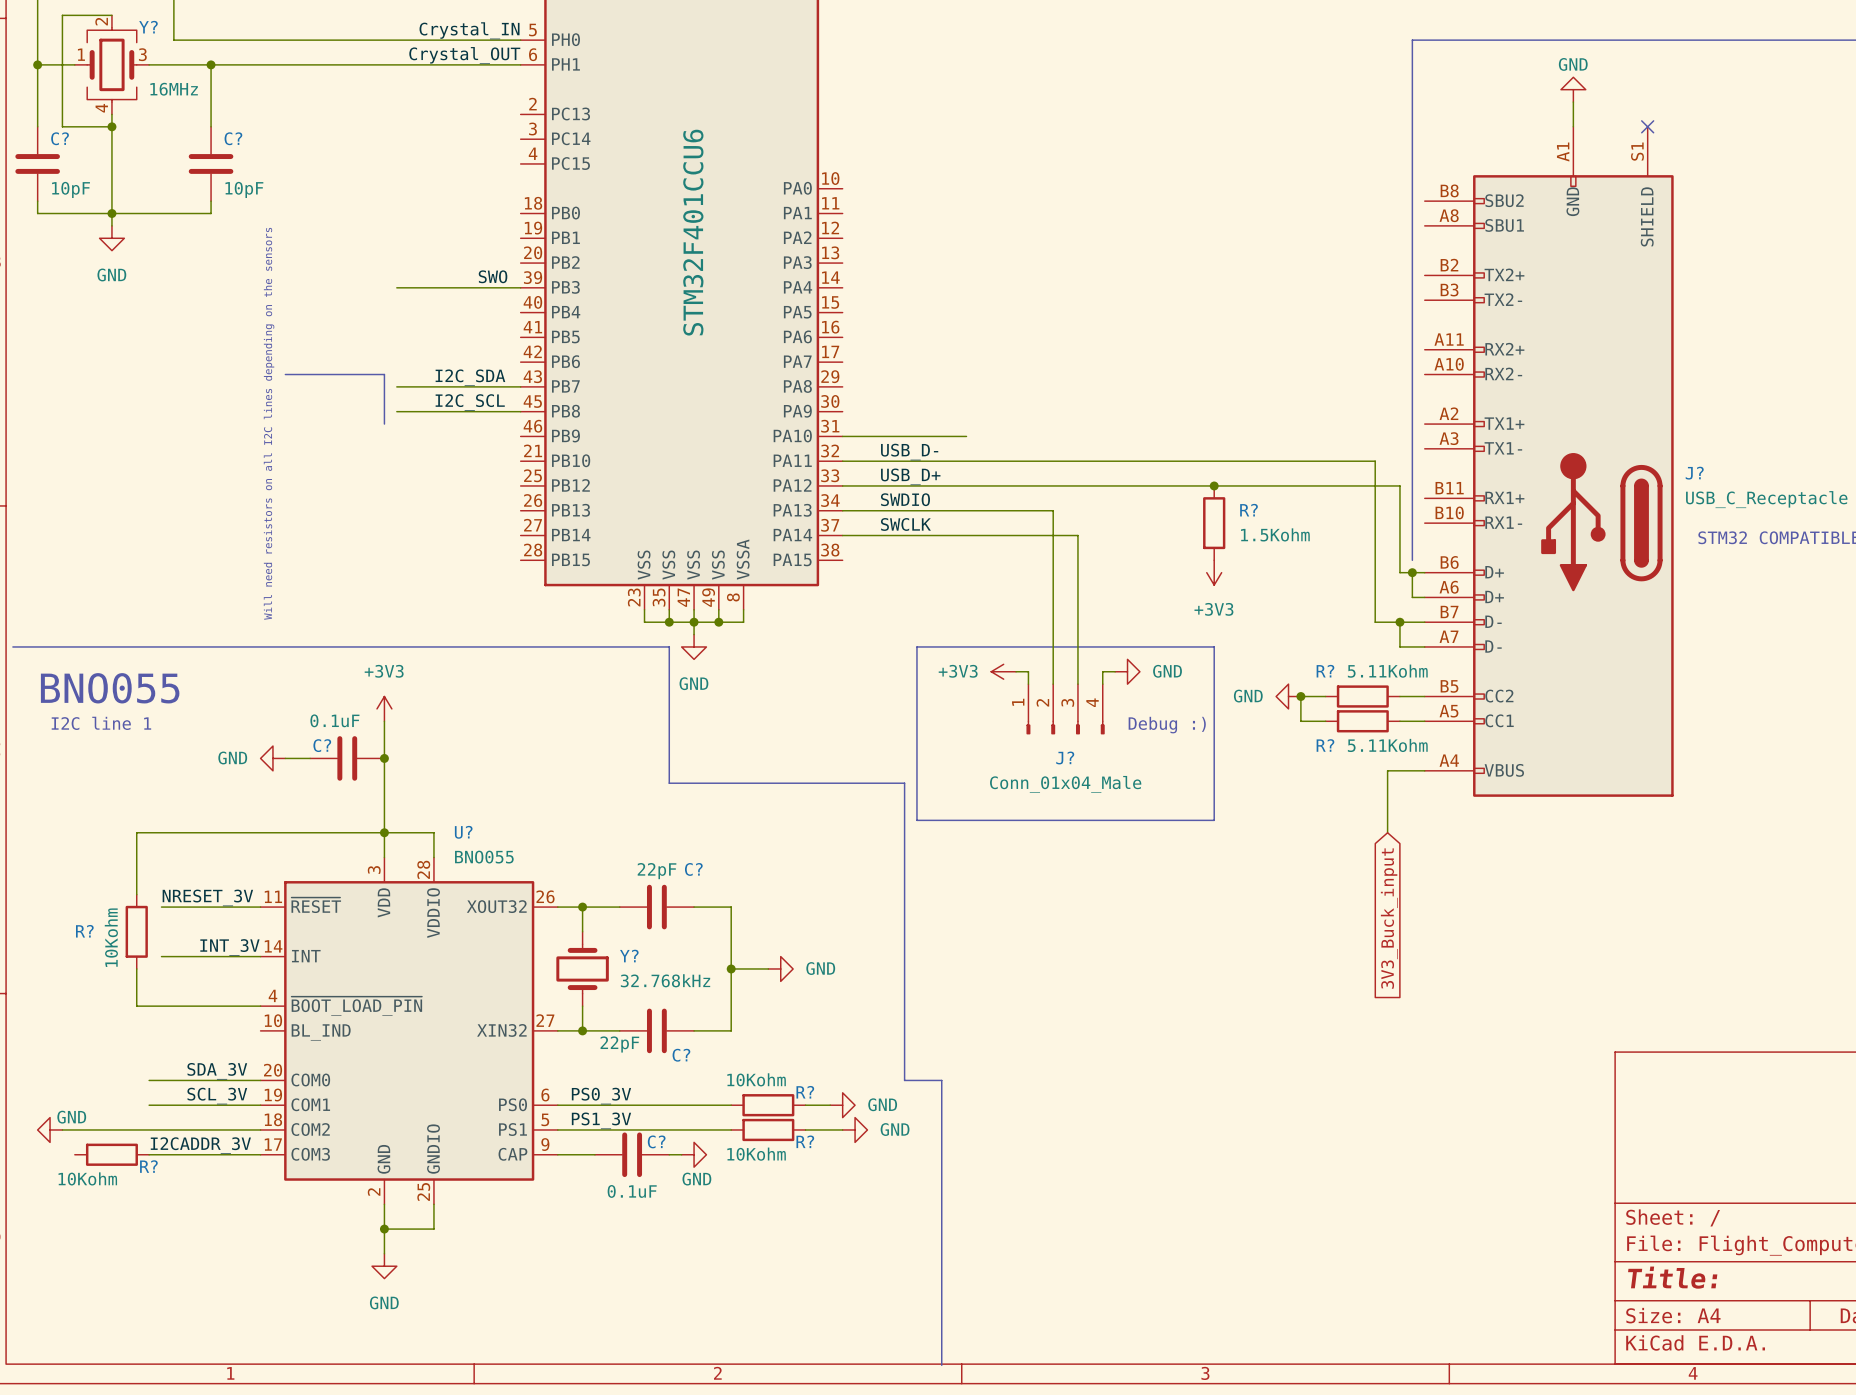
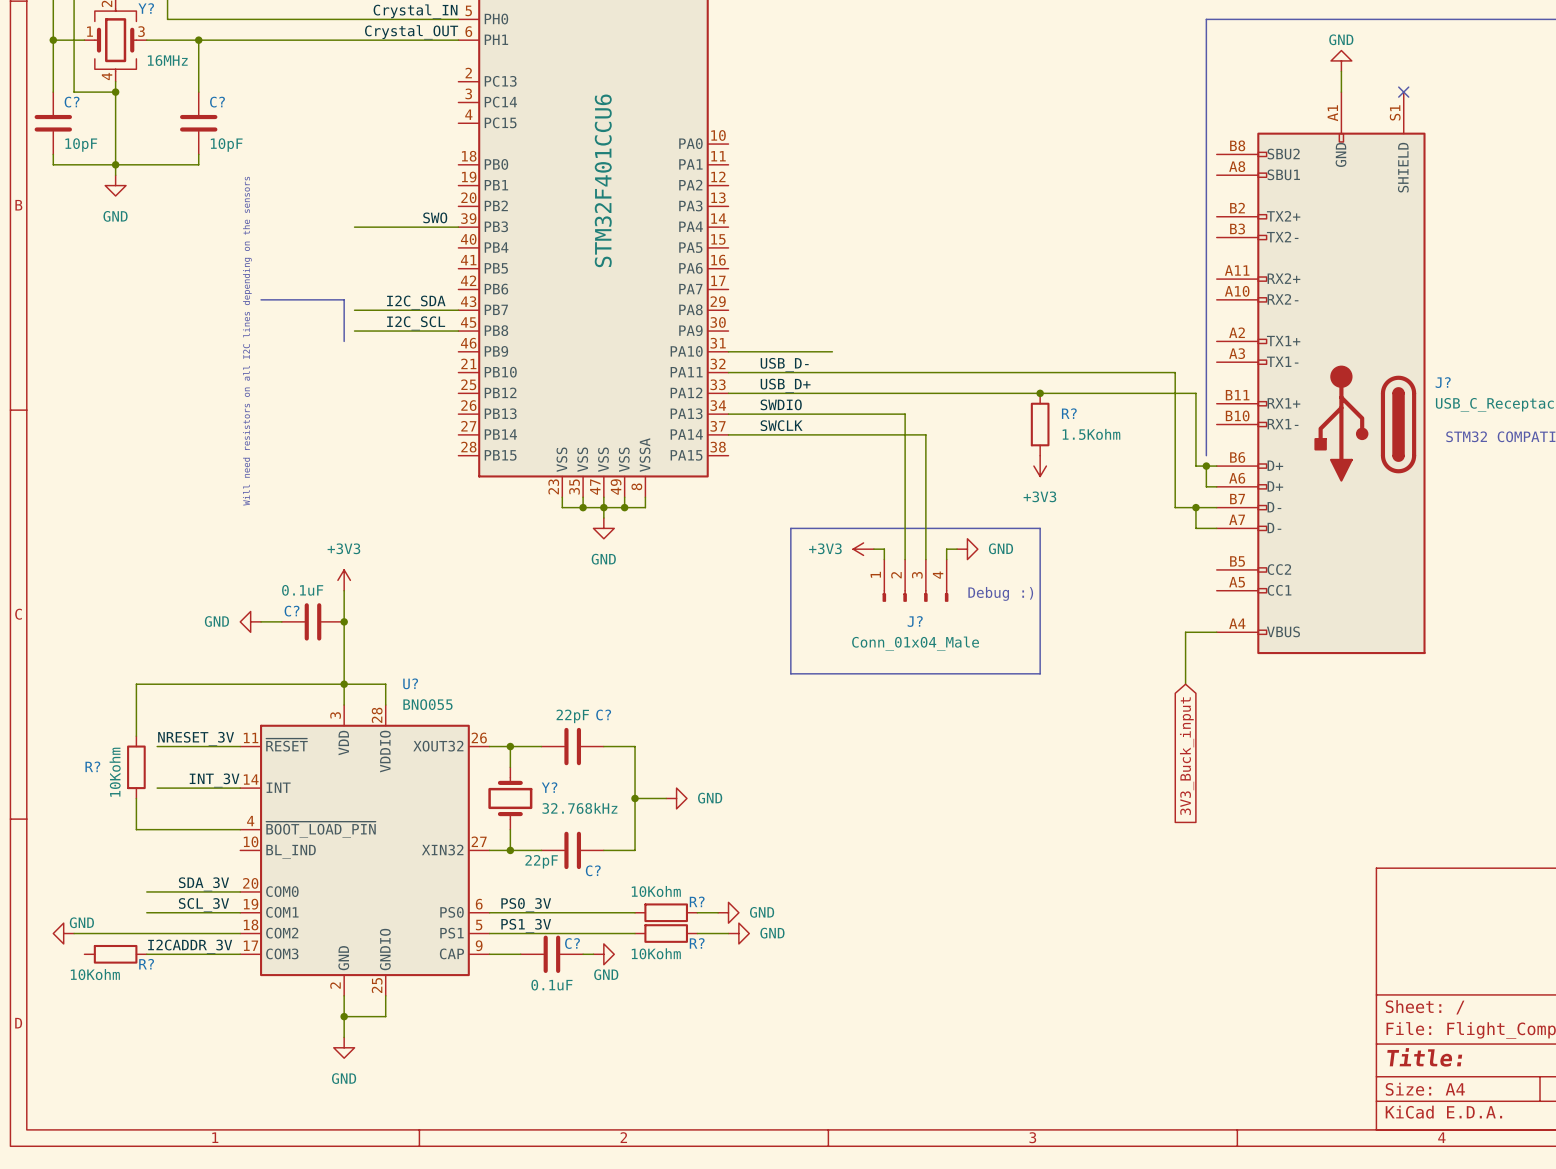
line: (12, 646) (669, 646) (669, 783) (904, 783) (904, 1080) (941, 1080) (941, 1365) -> none
text: BNO055 (110, 688) -> none
power symbol: GND (1288, 696) -> none
junction: (1300, 696) -> none
wire: (1325, 696) (1300, 696) (1300, 721) (1325, 721) -> none
R?: 5.11Kohm (1362, 696) -> none
wire: (1399, 696) (1424, 696) -> none
R?: 5.11Kohm (1362, 721) -> none
wire: (1399, 721) (1424, 721) -> none
text: I2C line 1 (101, 723) -> none

